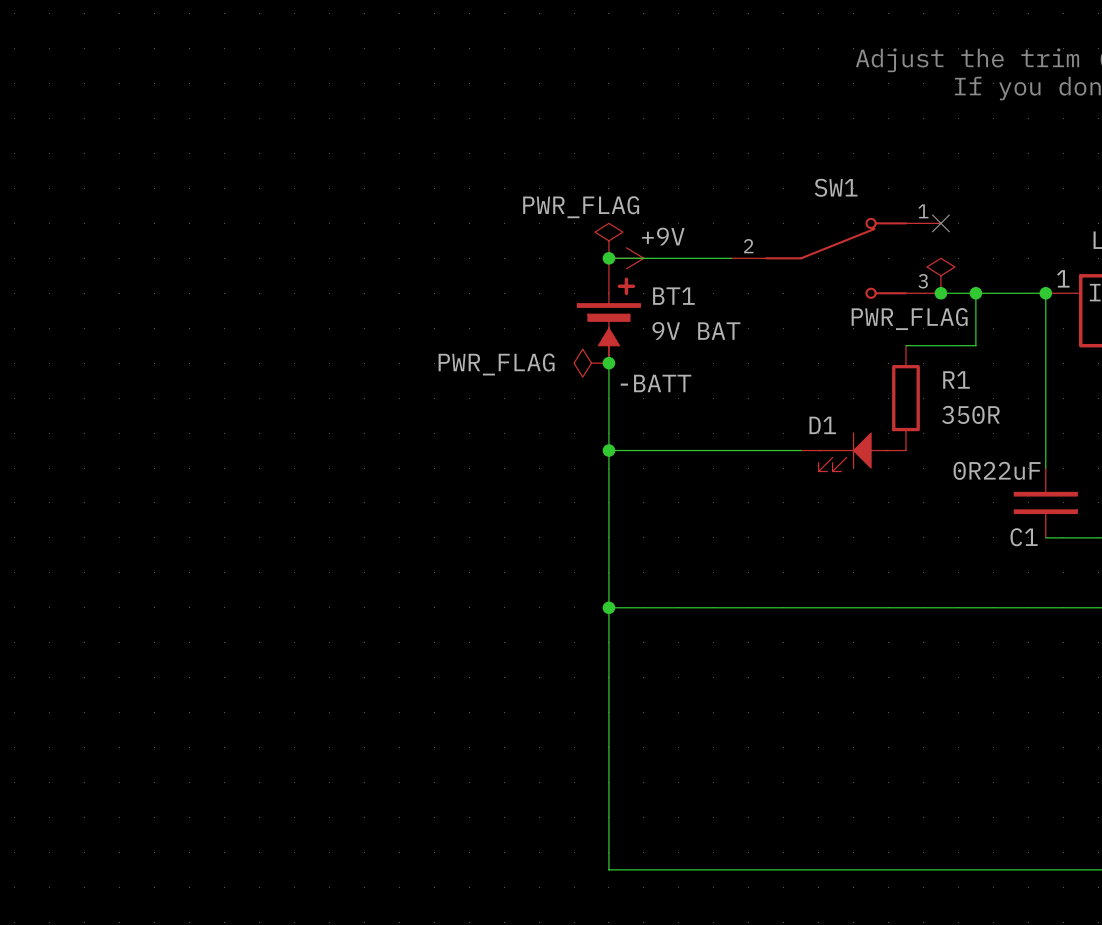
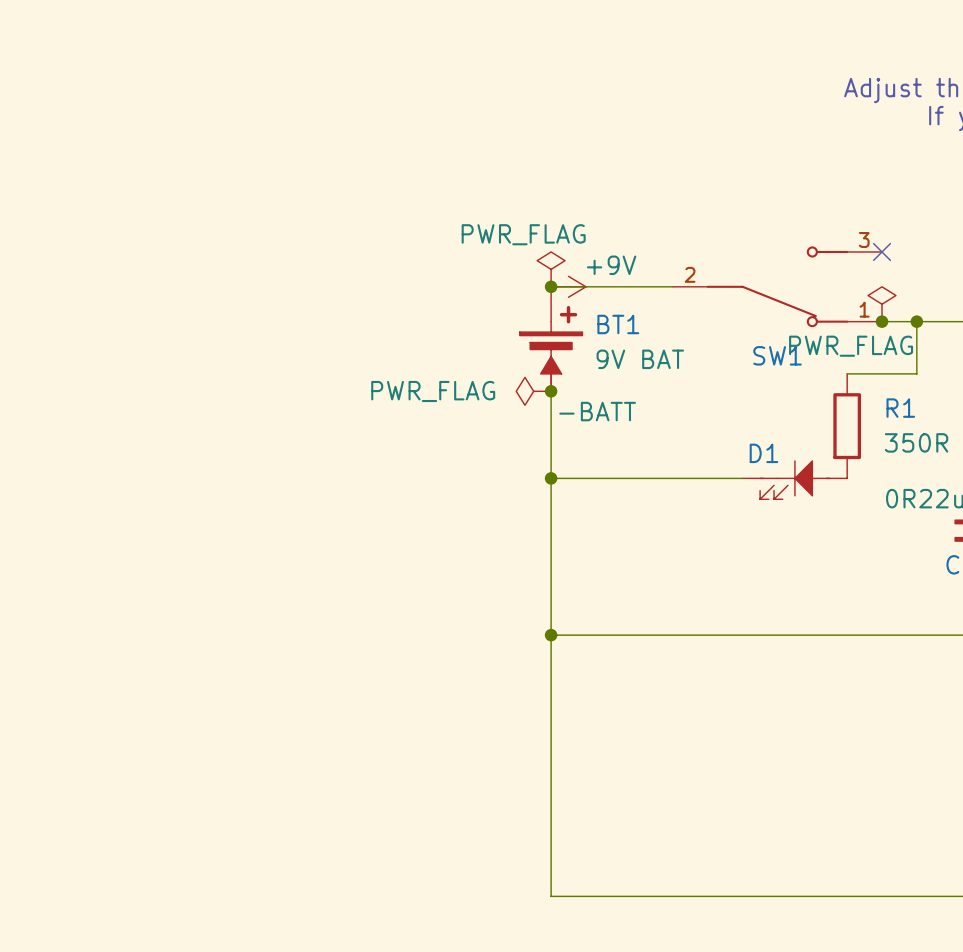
SW1 flip: as is (836, 258) -> up-down (777, 286)

